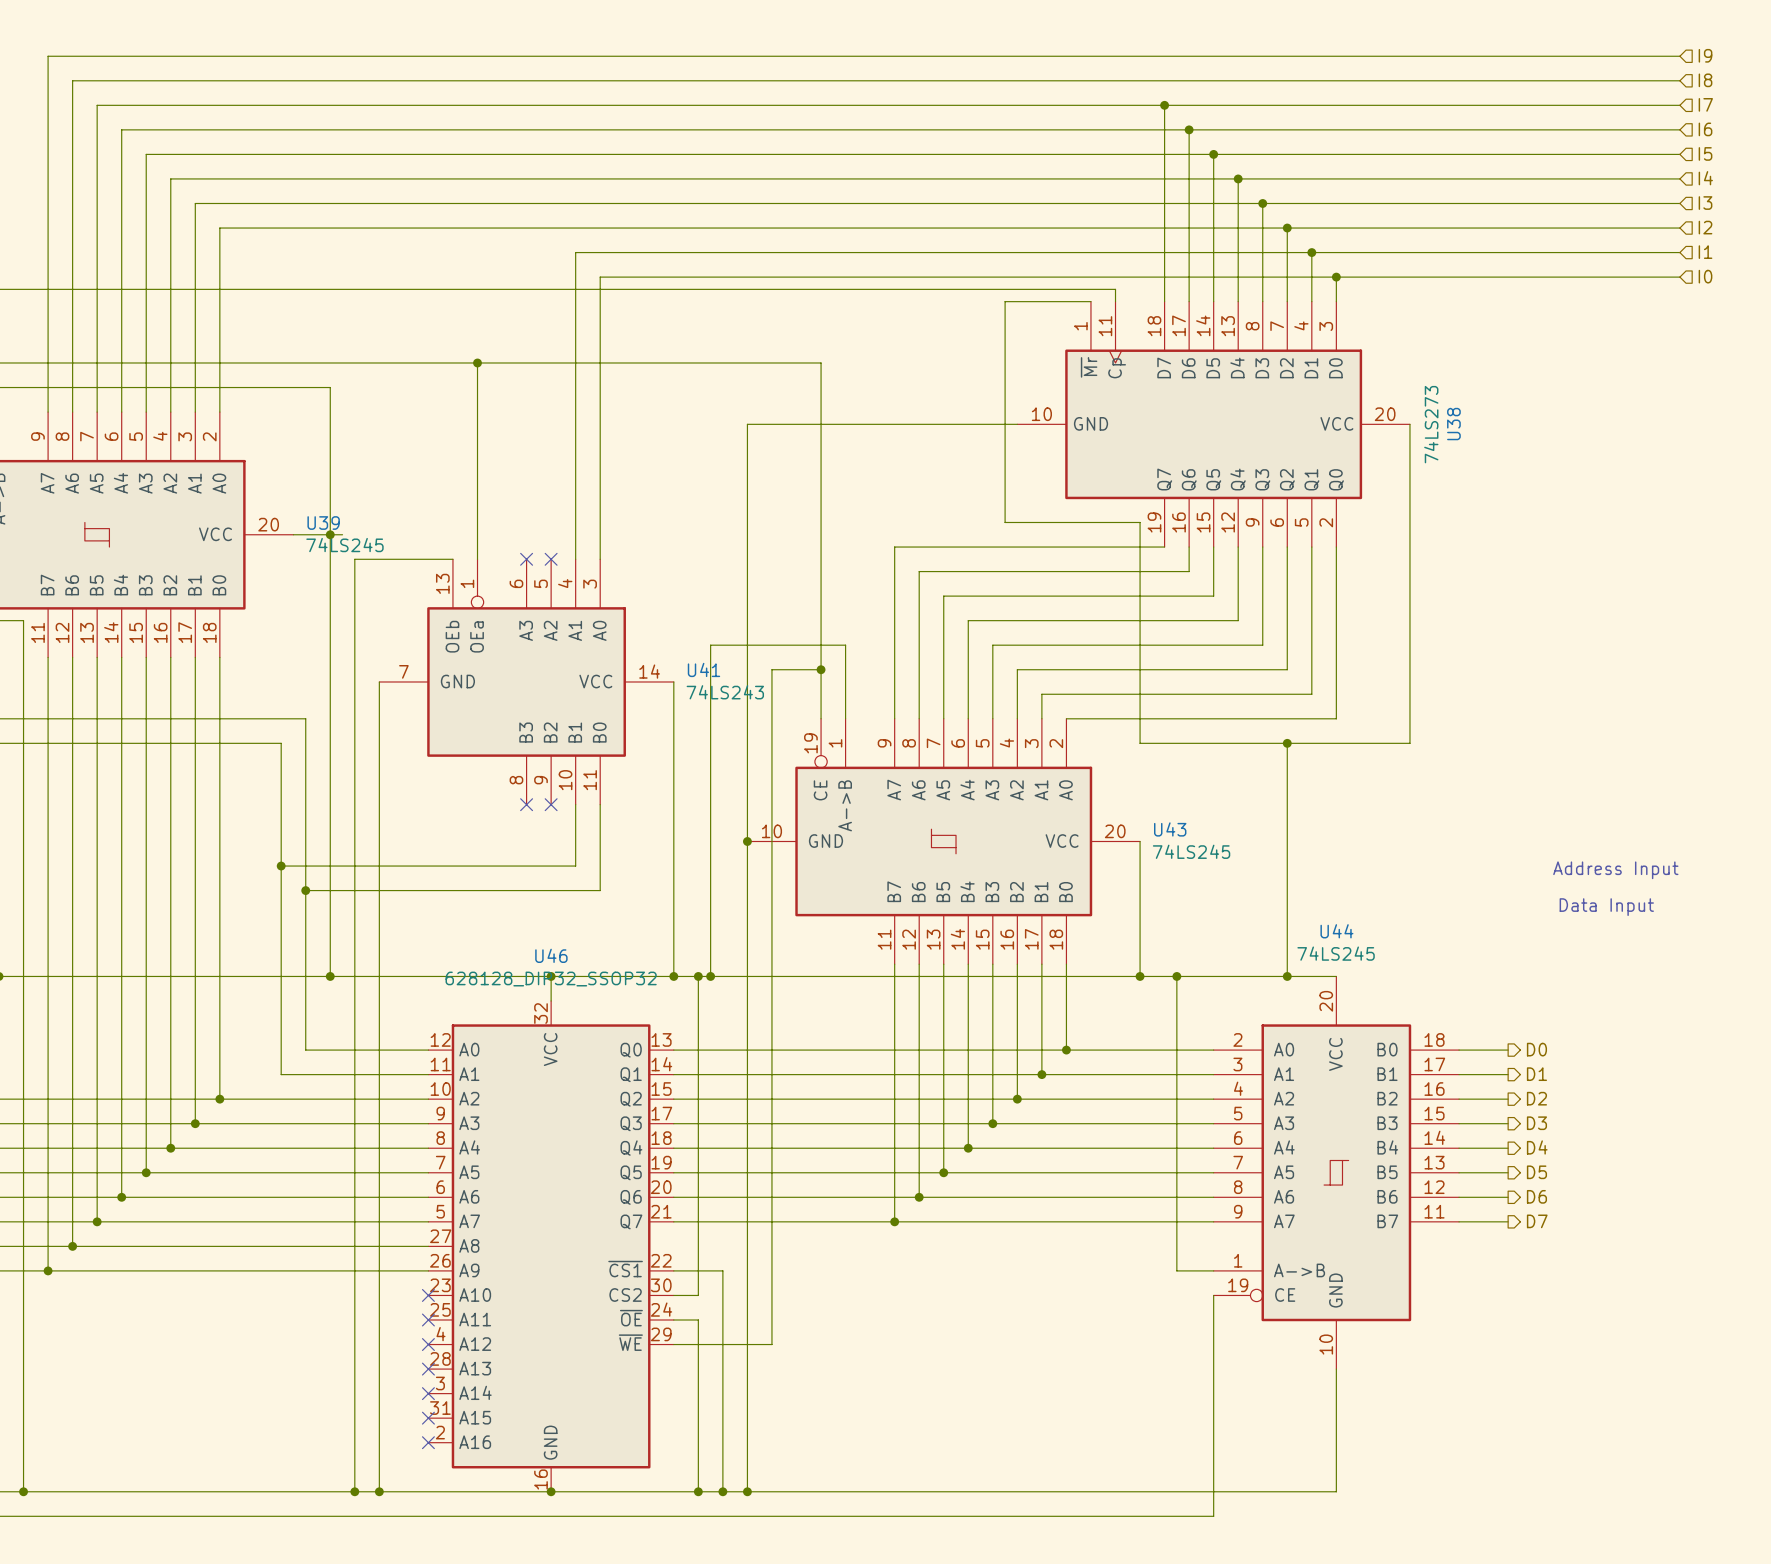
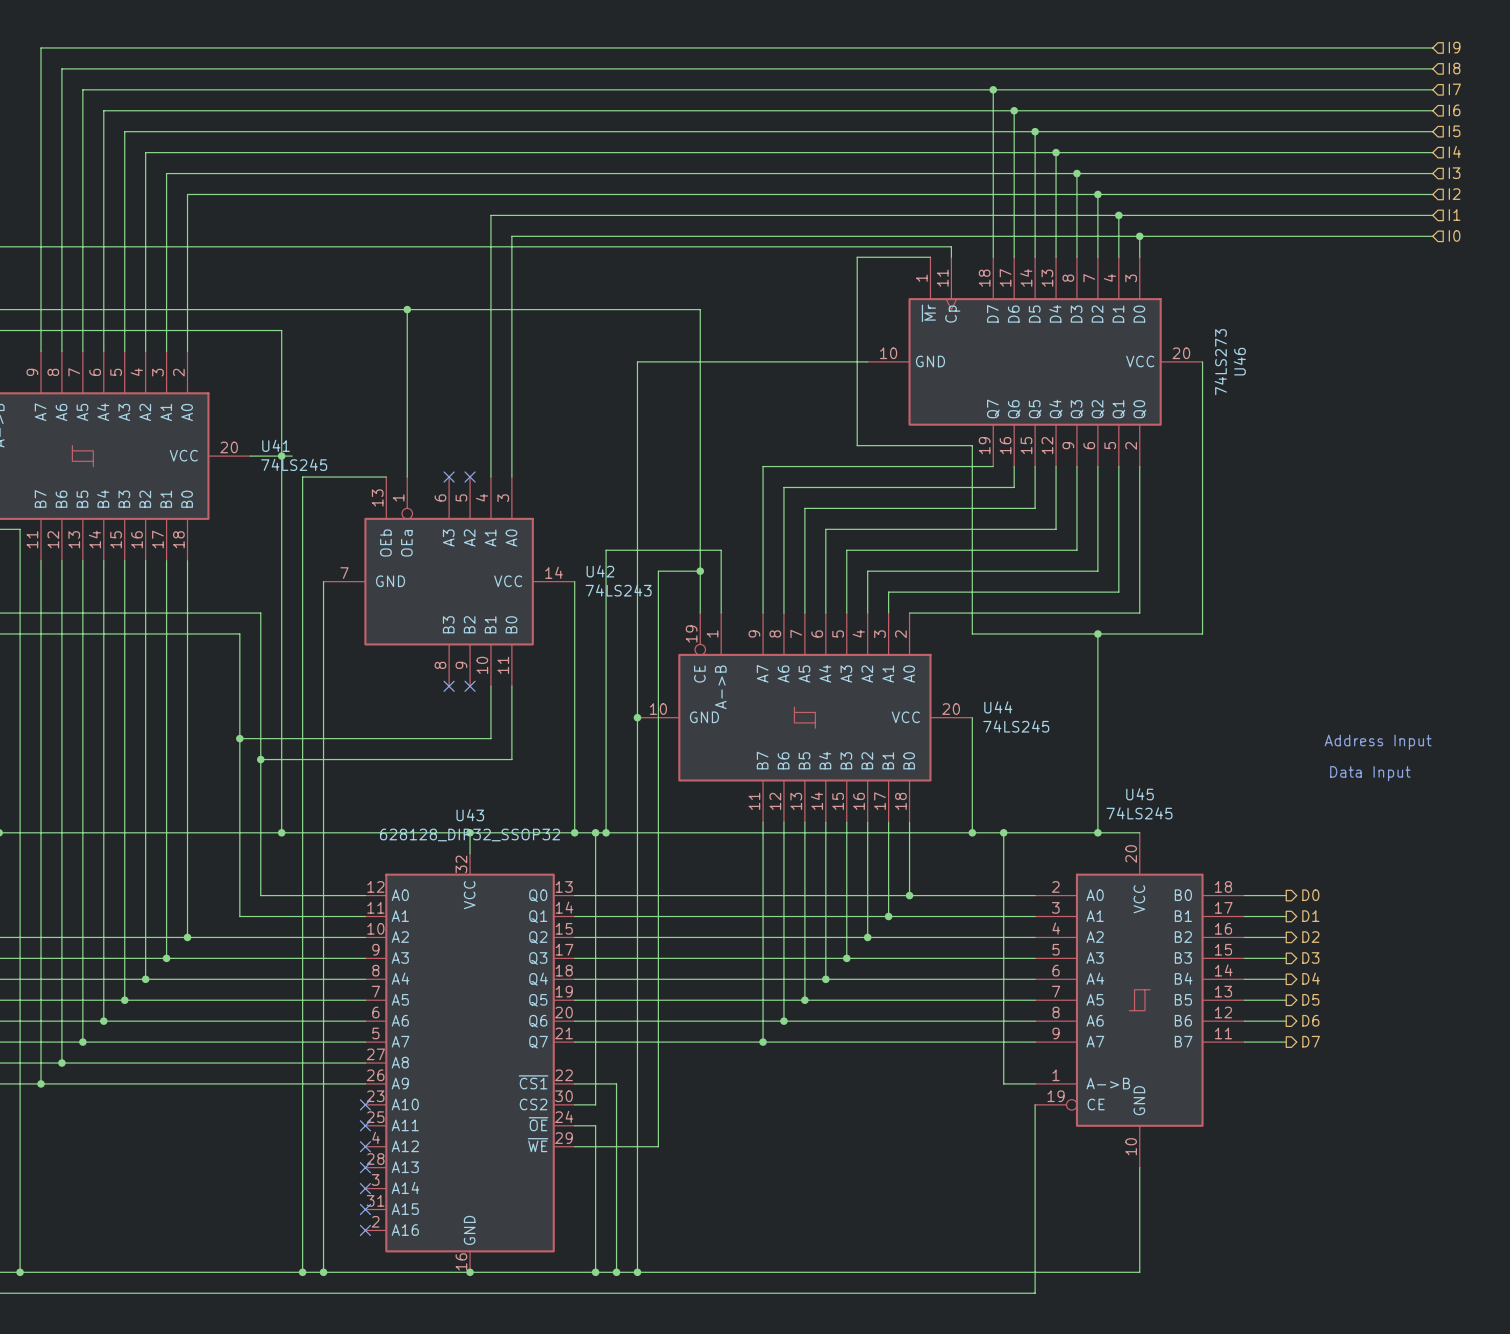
U38 name: U38 (1453, 424) -> U46 (1239, 361)
U39 name: U39 (323, 523) -> U41 (276, 445)
U41 name: U41 (703, 669) -> U42 (600, 571)
U43 name: U43 (1170, 829) -> U44 (998, 707)
U44 name: U44 (1336, 931) -> U45 (1140, 794)
U46 name: U46 (551, 955) -> U43 (470, 815)

